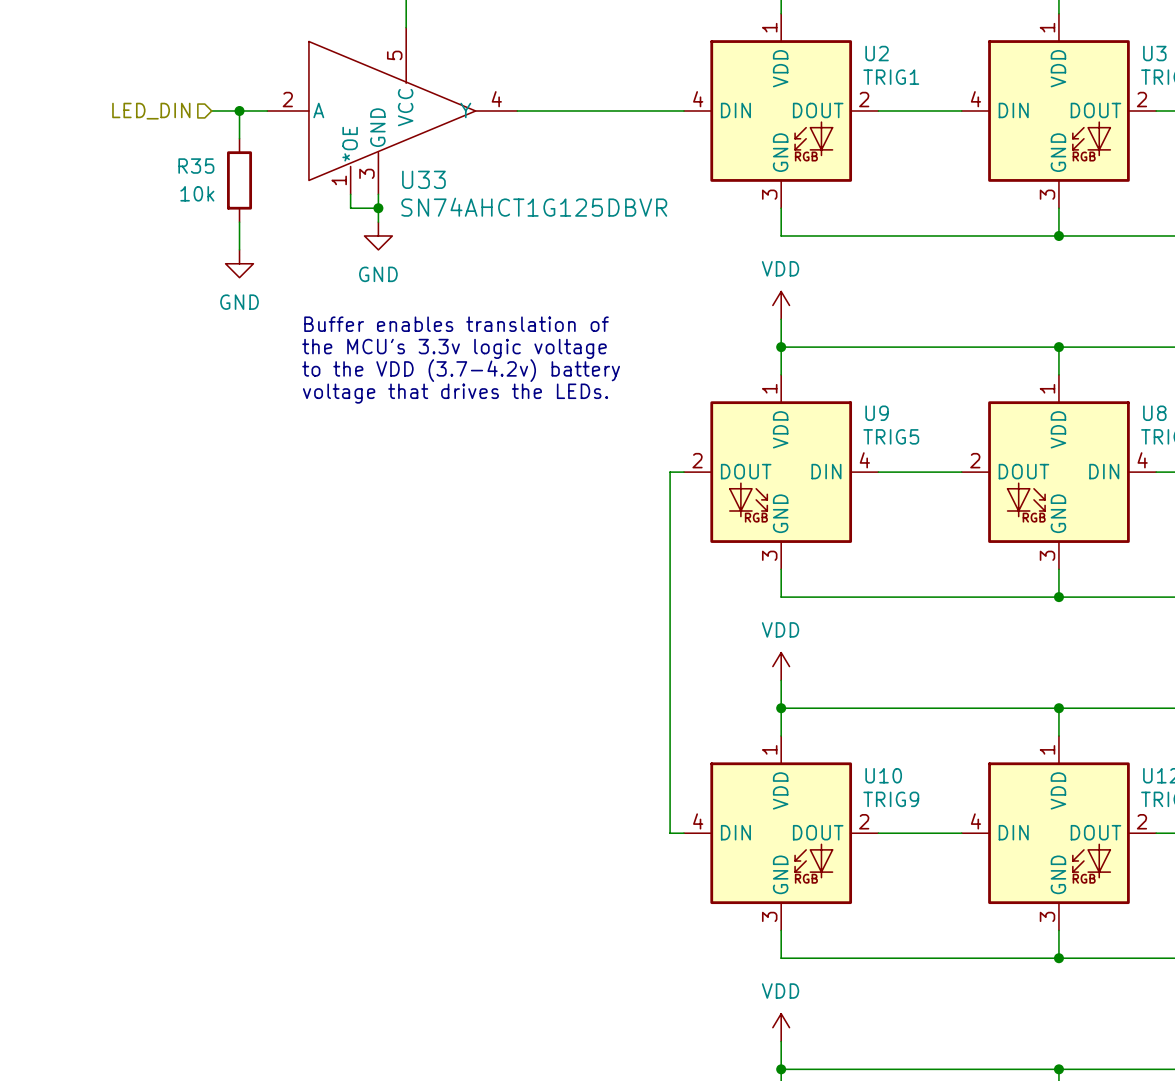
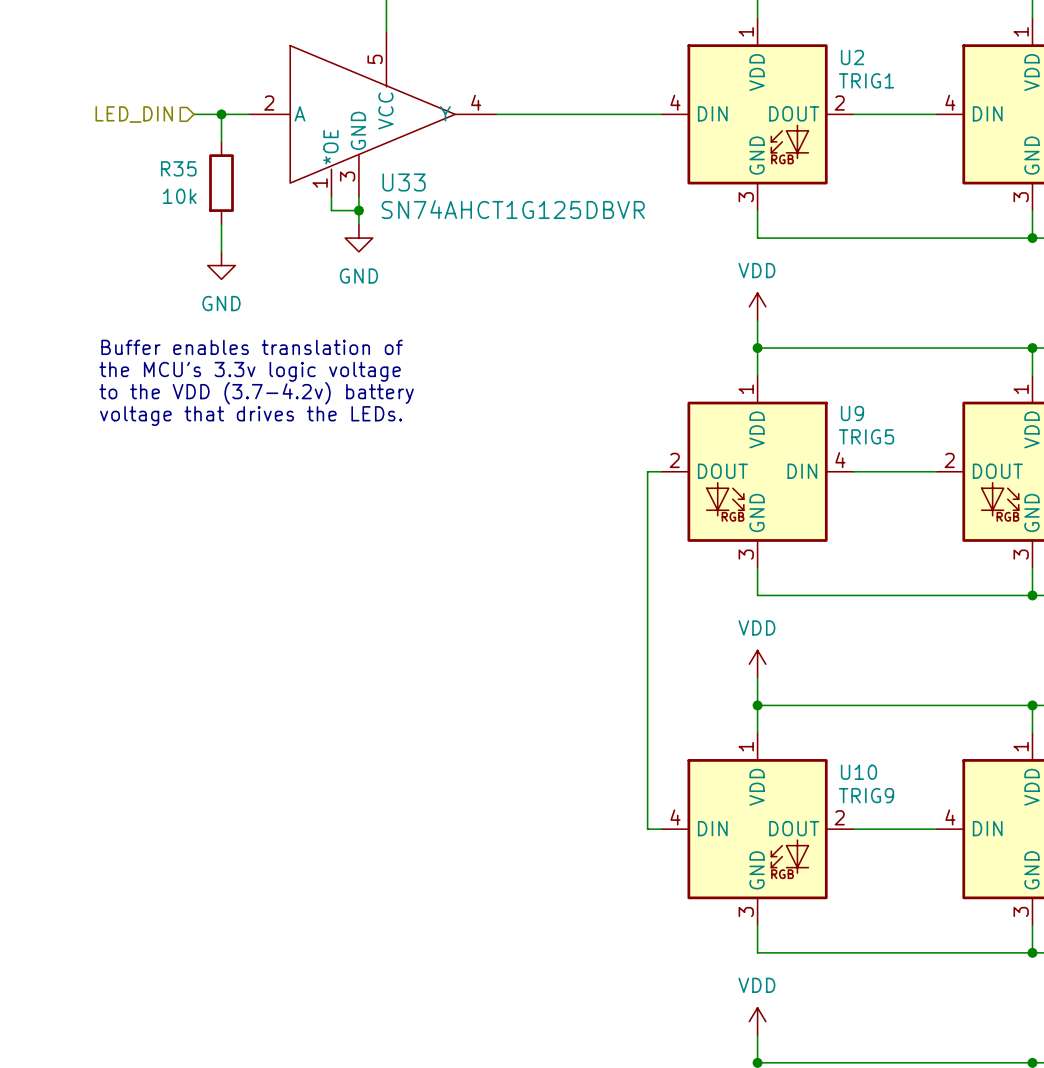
text position: Buffer enables translation of (456, 324) -> Buffer enables translation of (252, 347)
text position: the MCU's 3.3v logic voltage (454, 348) -> the MCU's 3.3v logic voltage (250, 371)
text position: to the VDD (3.7-4.2v) battery (461, 370) -> to the VDD (3.7-4.2v) battery (256, 393)
text position: voltage that drives the LEDs. (455, 393) -> voltage that drives the LEDs. (251, 416)

